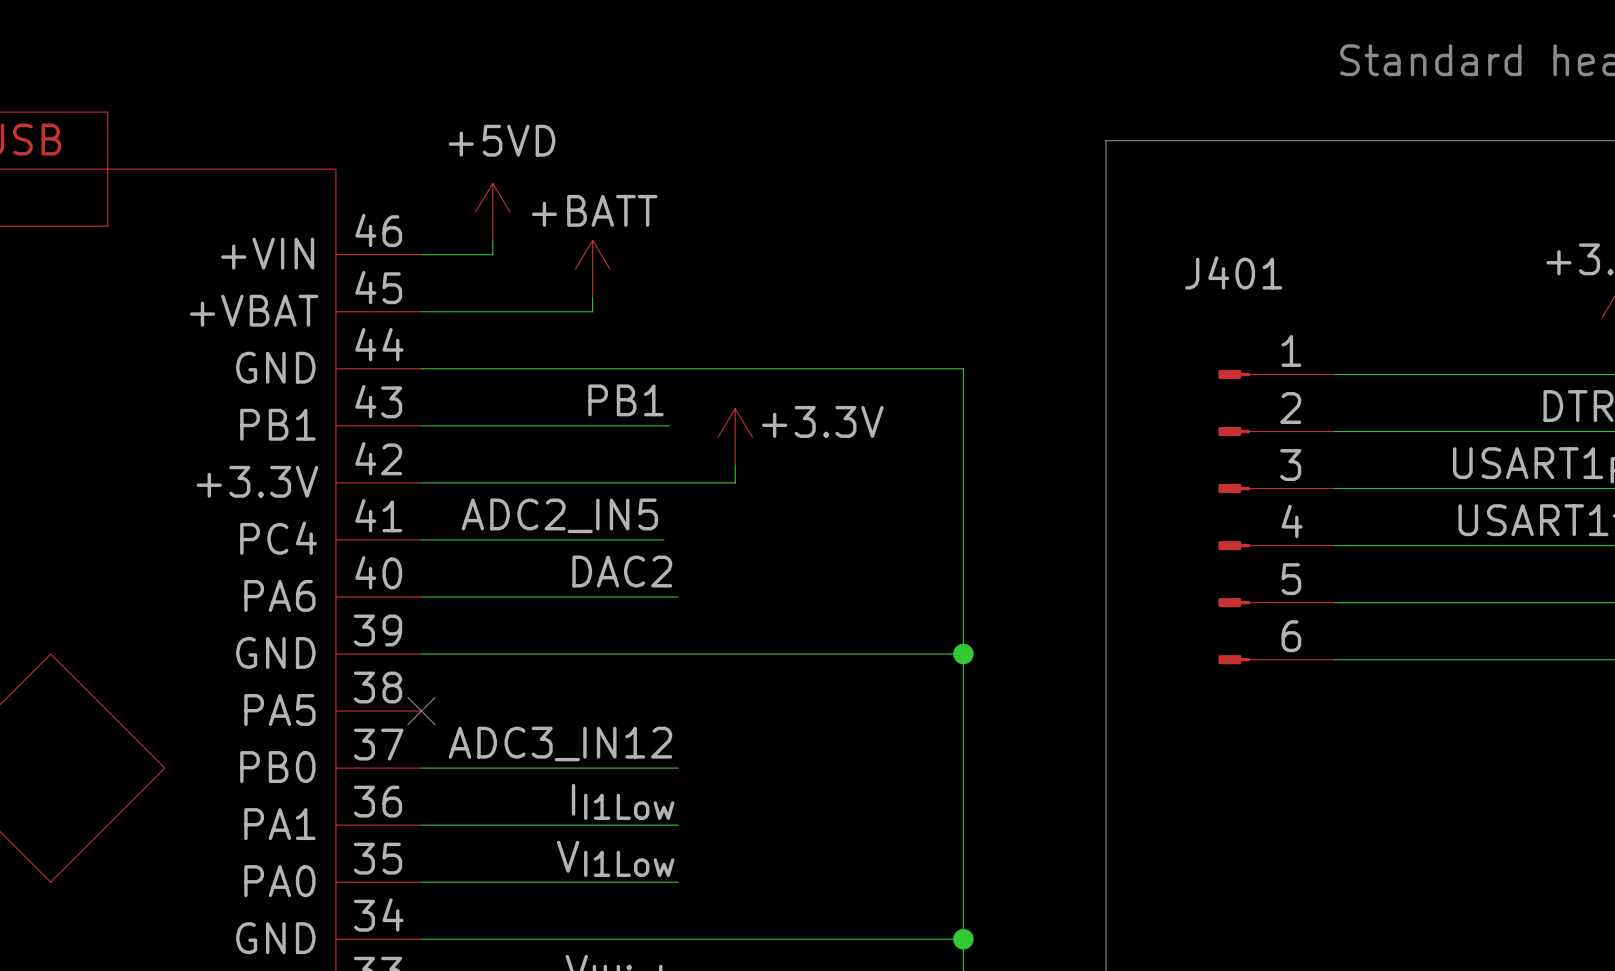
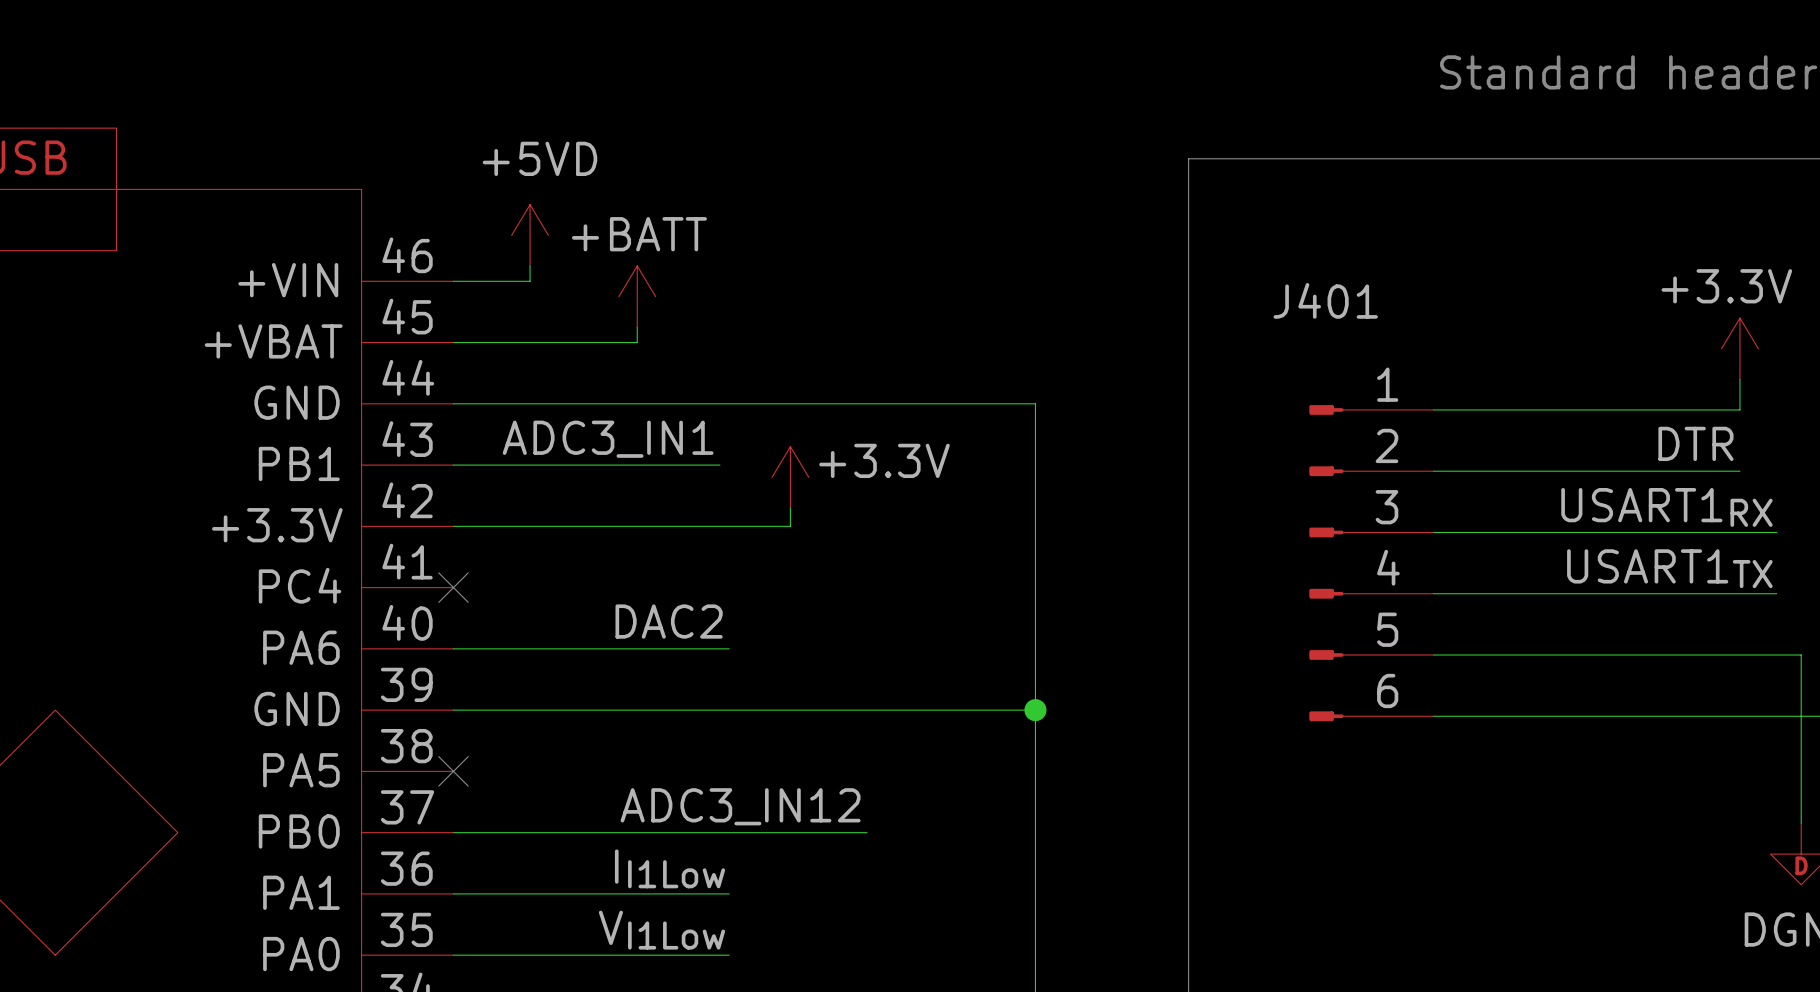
label: PB1 (625, 400) -> ADC3_IN1 (608, 439)
label: ADC2_IN5 (559, 515) -> none
wire: (421, 539) (663, 539) -> none
no-connect mark: none -> (453, 587)
label position: ADC3_IN12 (560, 744) -> ADC3_IN12 (740, 806)
wire: none -> (729, 832) (866, 832)

